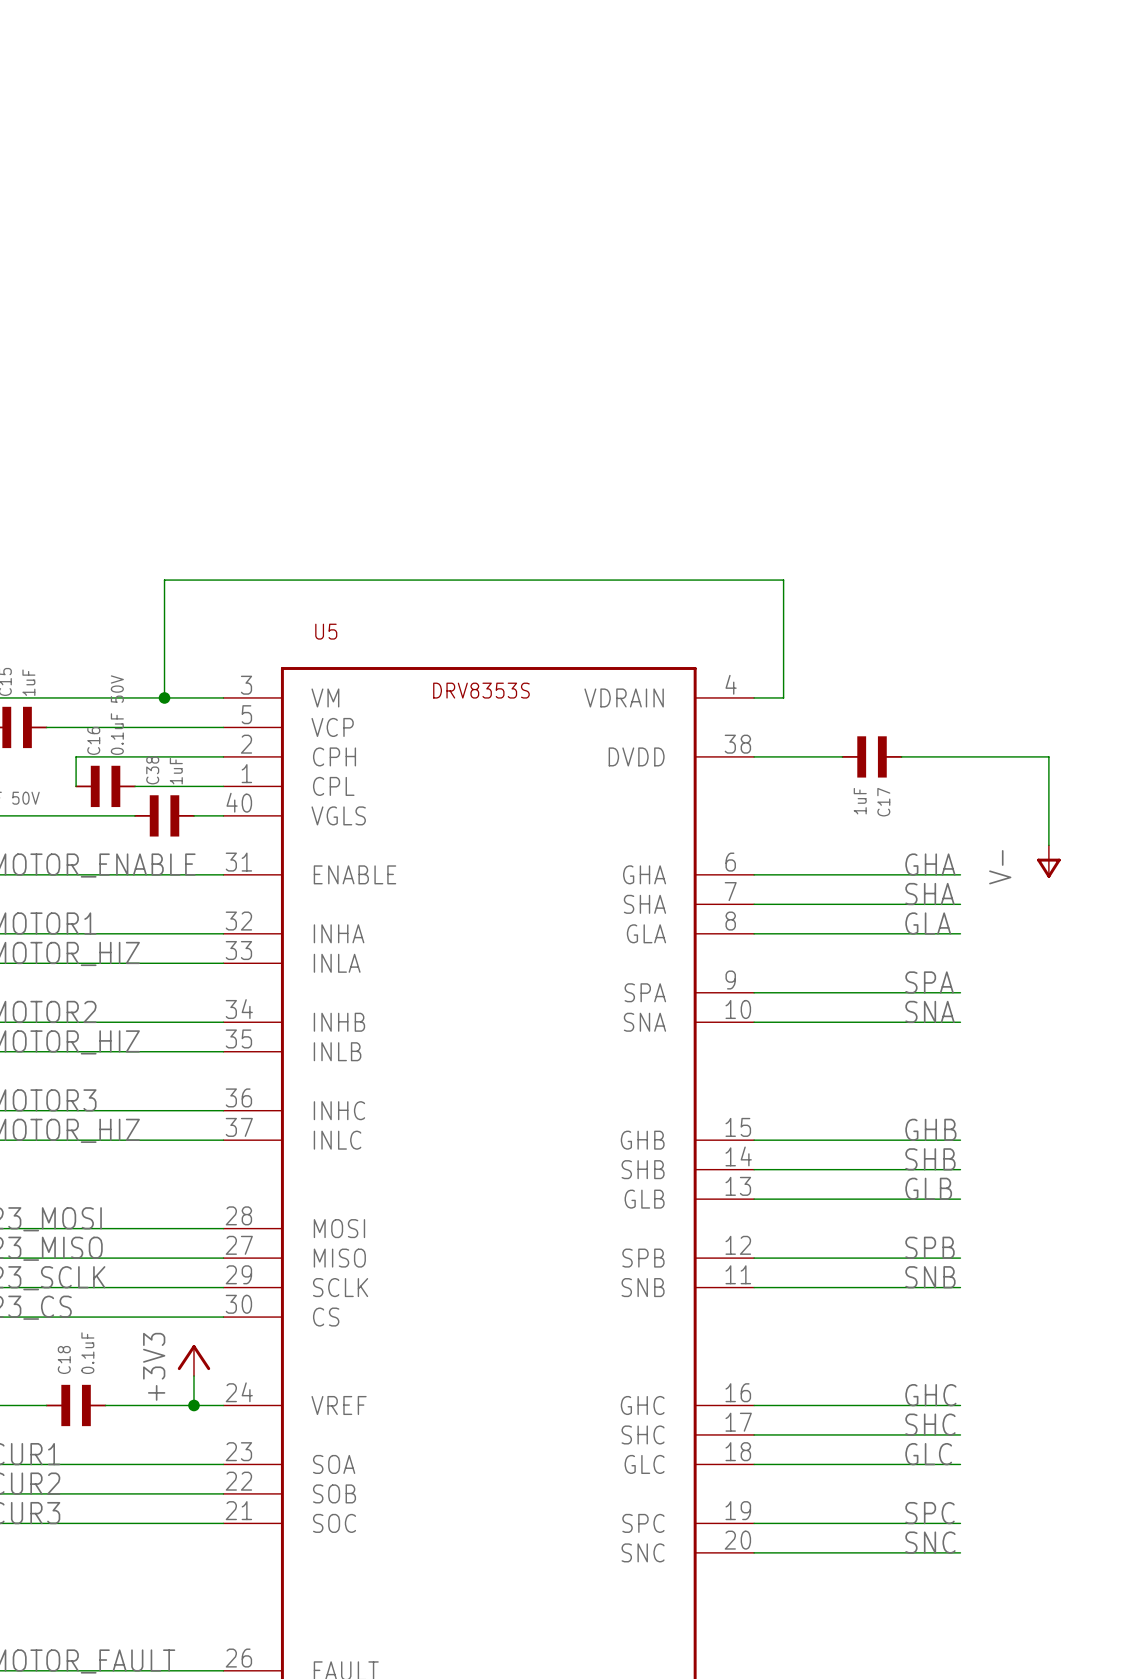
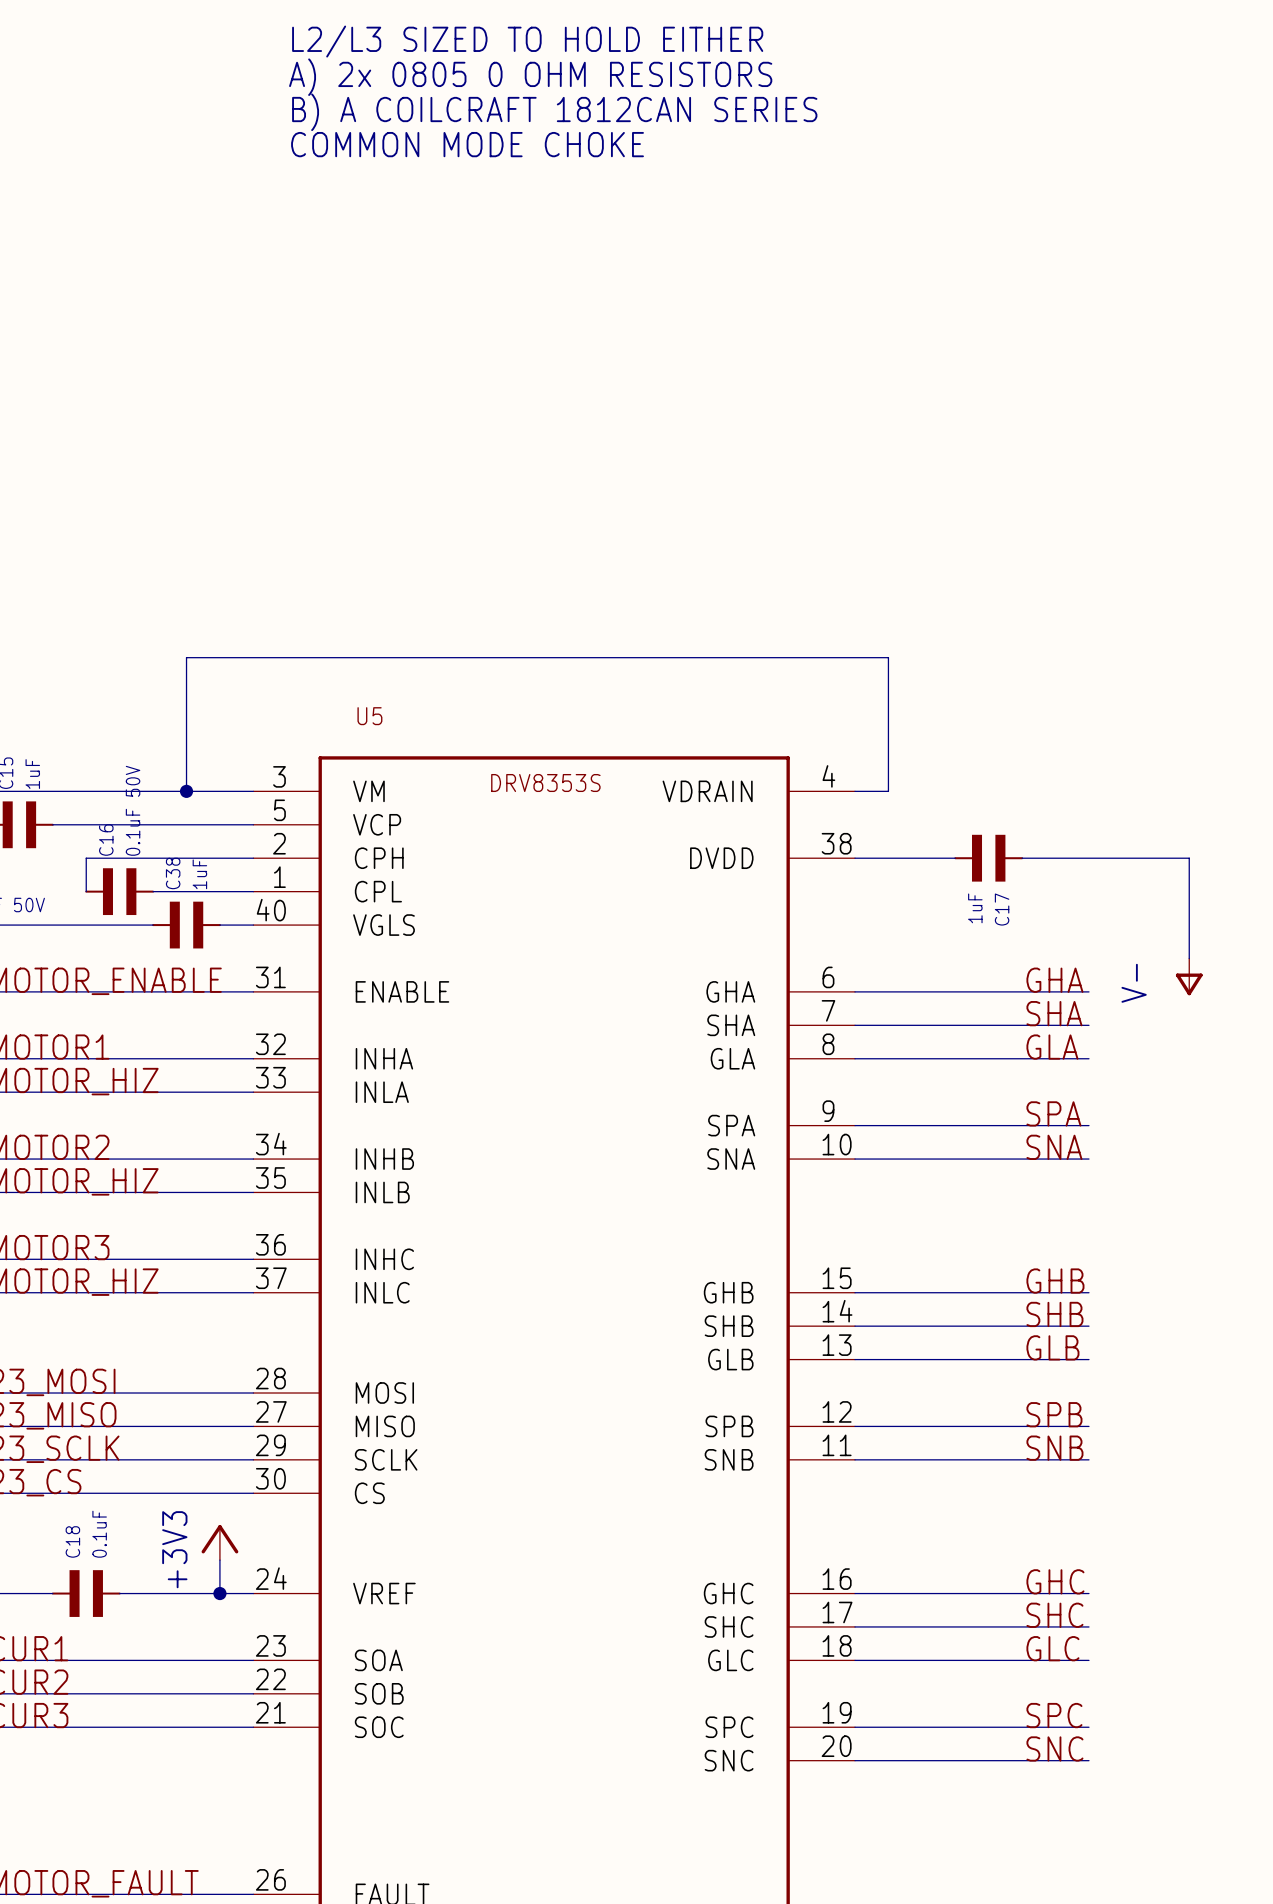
text: none -> L2/L3 SIZED TO HOLD EITHER (527, 41)
text: none -> A) 2x 0805 0 OHM RESISTORS (530, 77)
text: none -> B) A COILCRAFT 1812CAN SERIES (554, 112)
text: none -> COMMON MODE CHOKE (467, 144)

